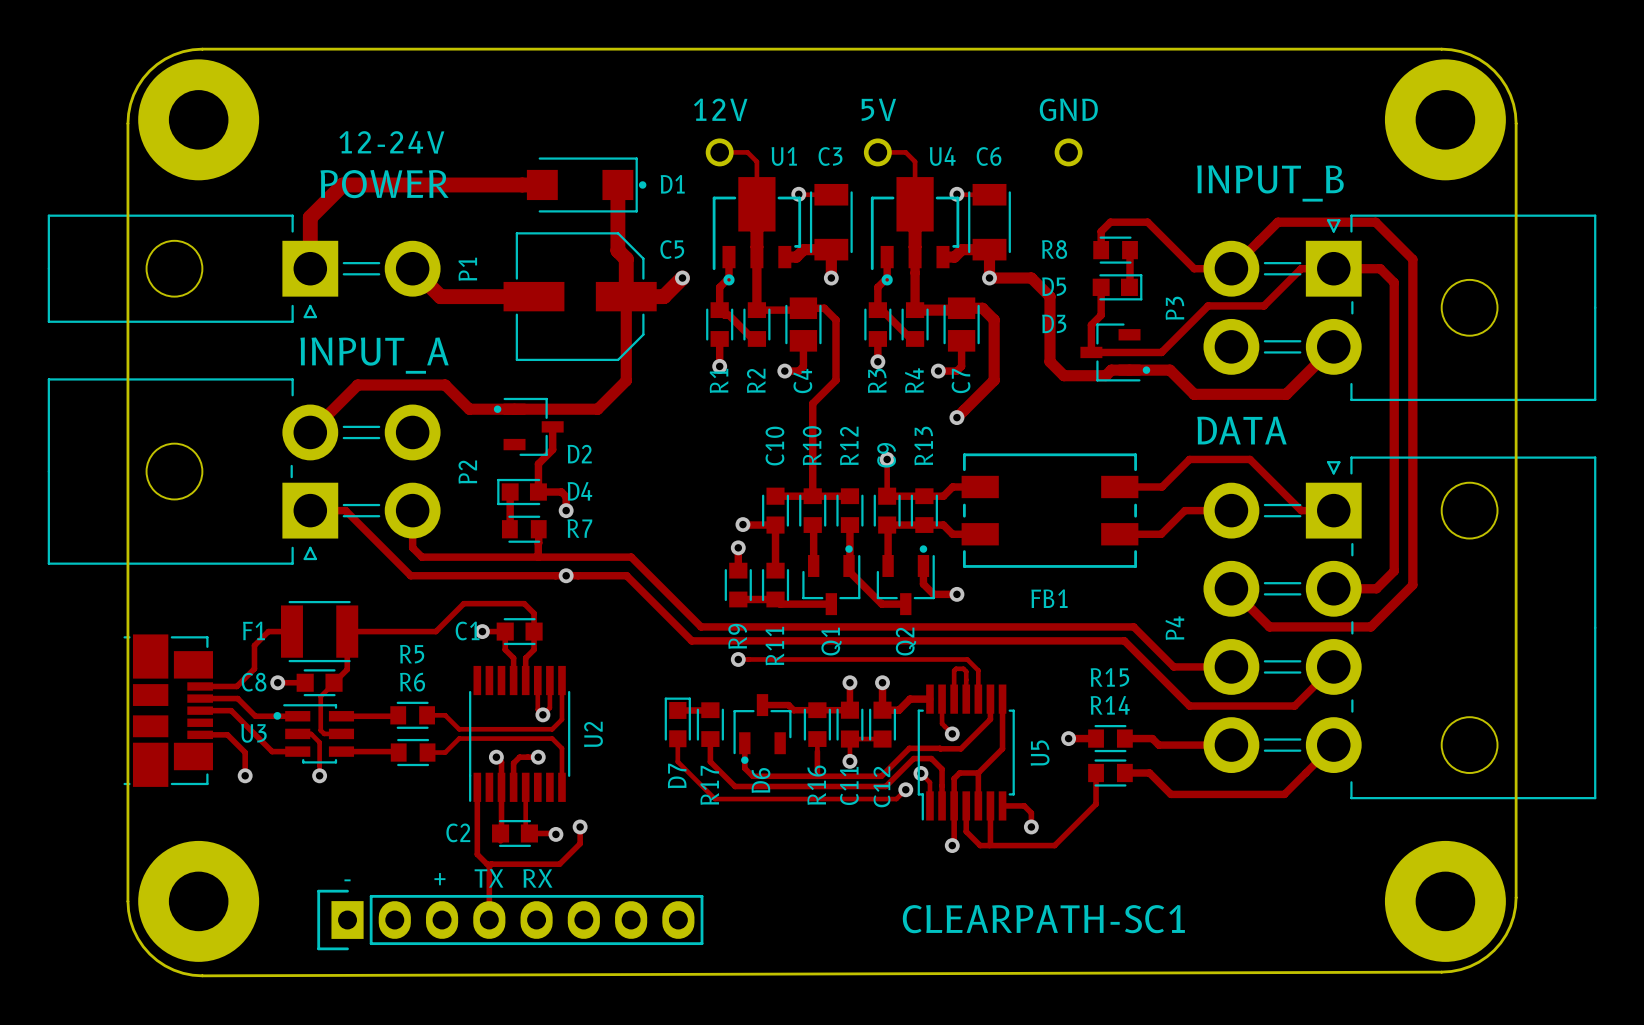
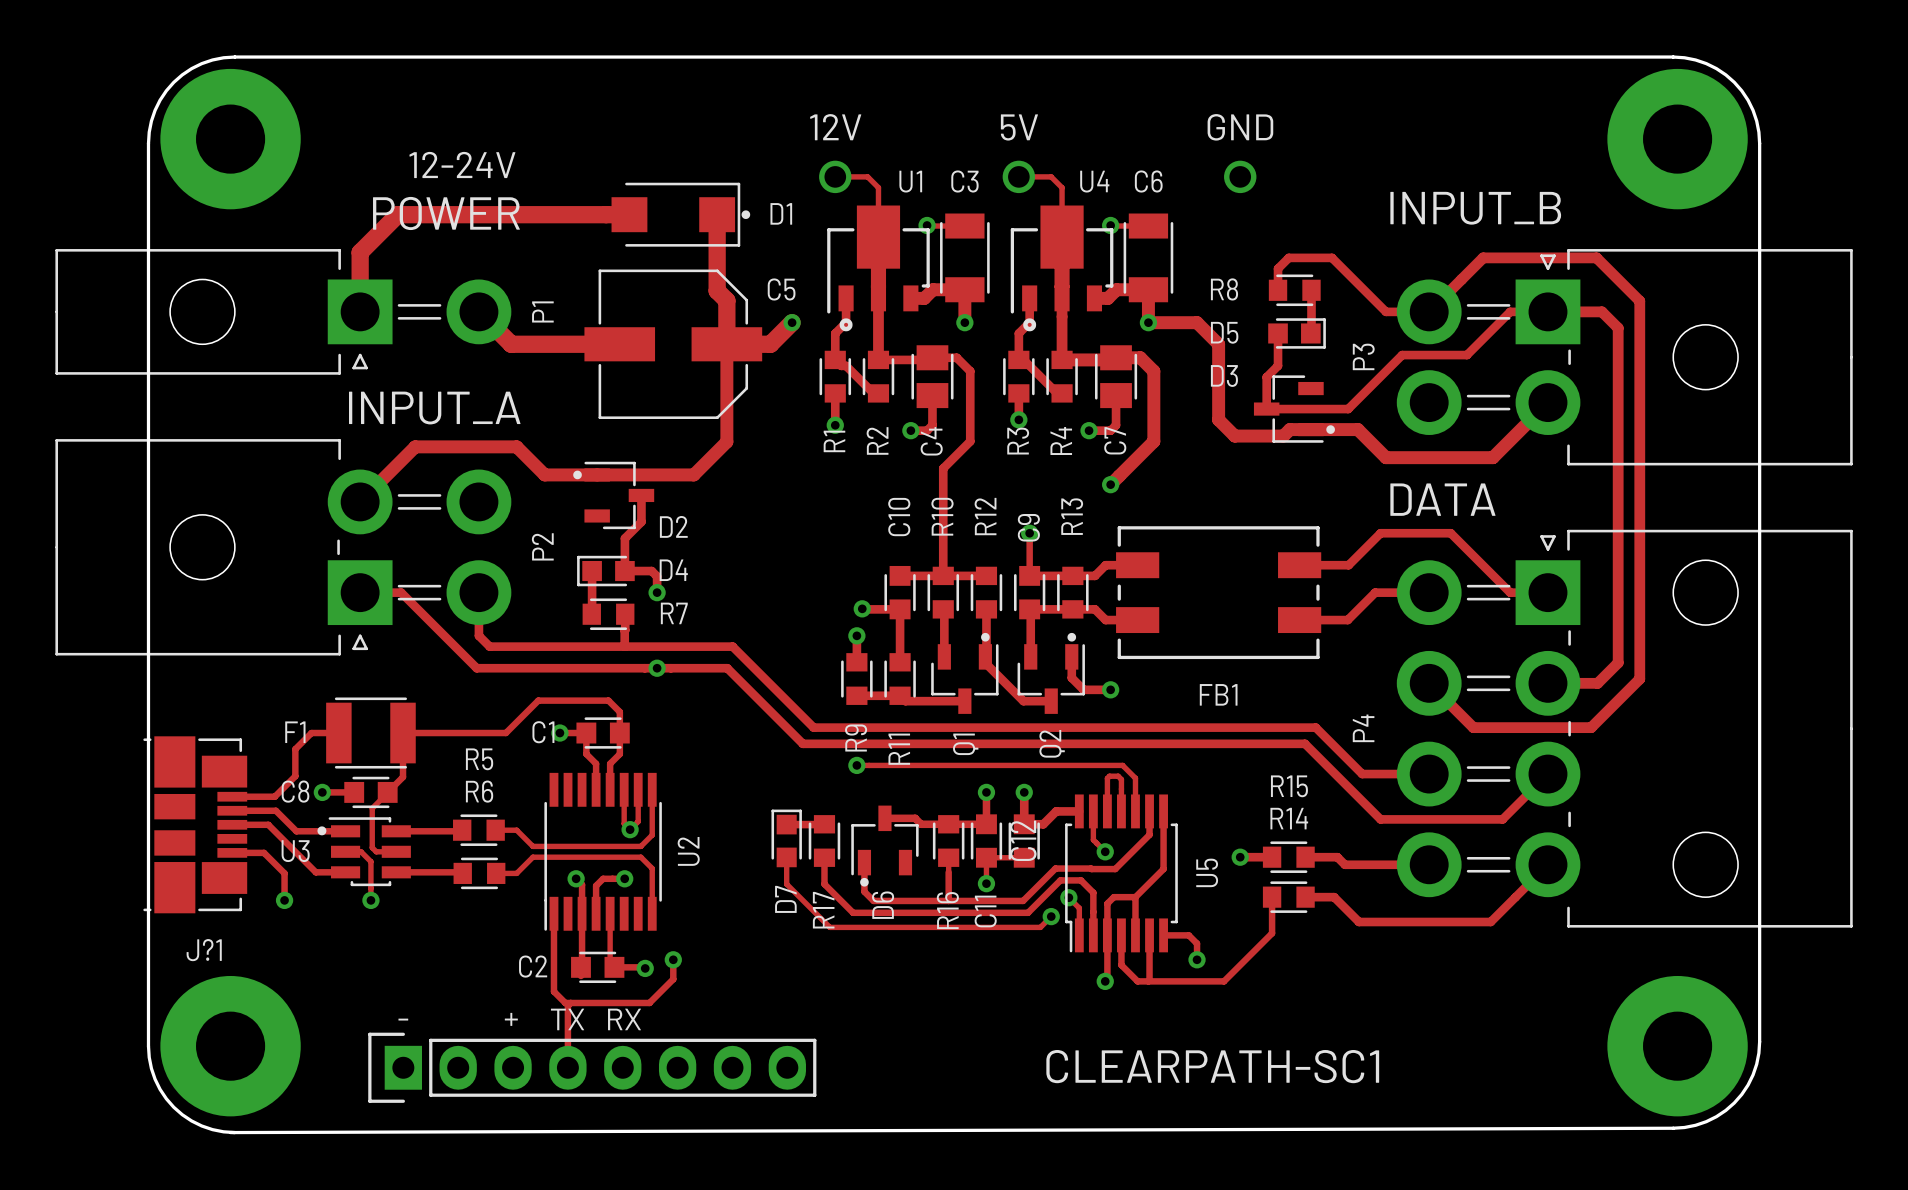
C12 name position: C12 (881, 786) -> C12 (1023, 840)
J?1 name: none -> J?1 (204, 950)

